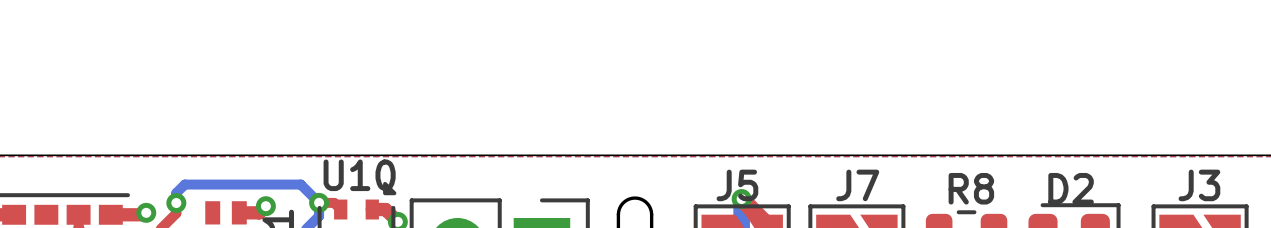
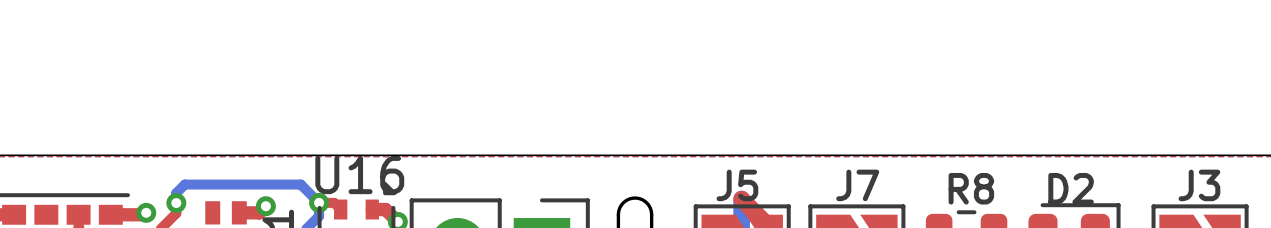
U10 name: U10 (359, 175) -> U16 (359, 175)
via: (741, 199) -> none

